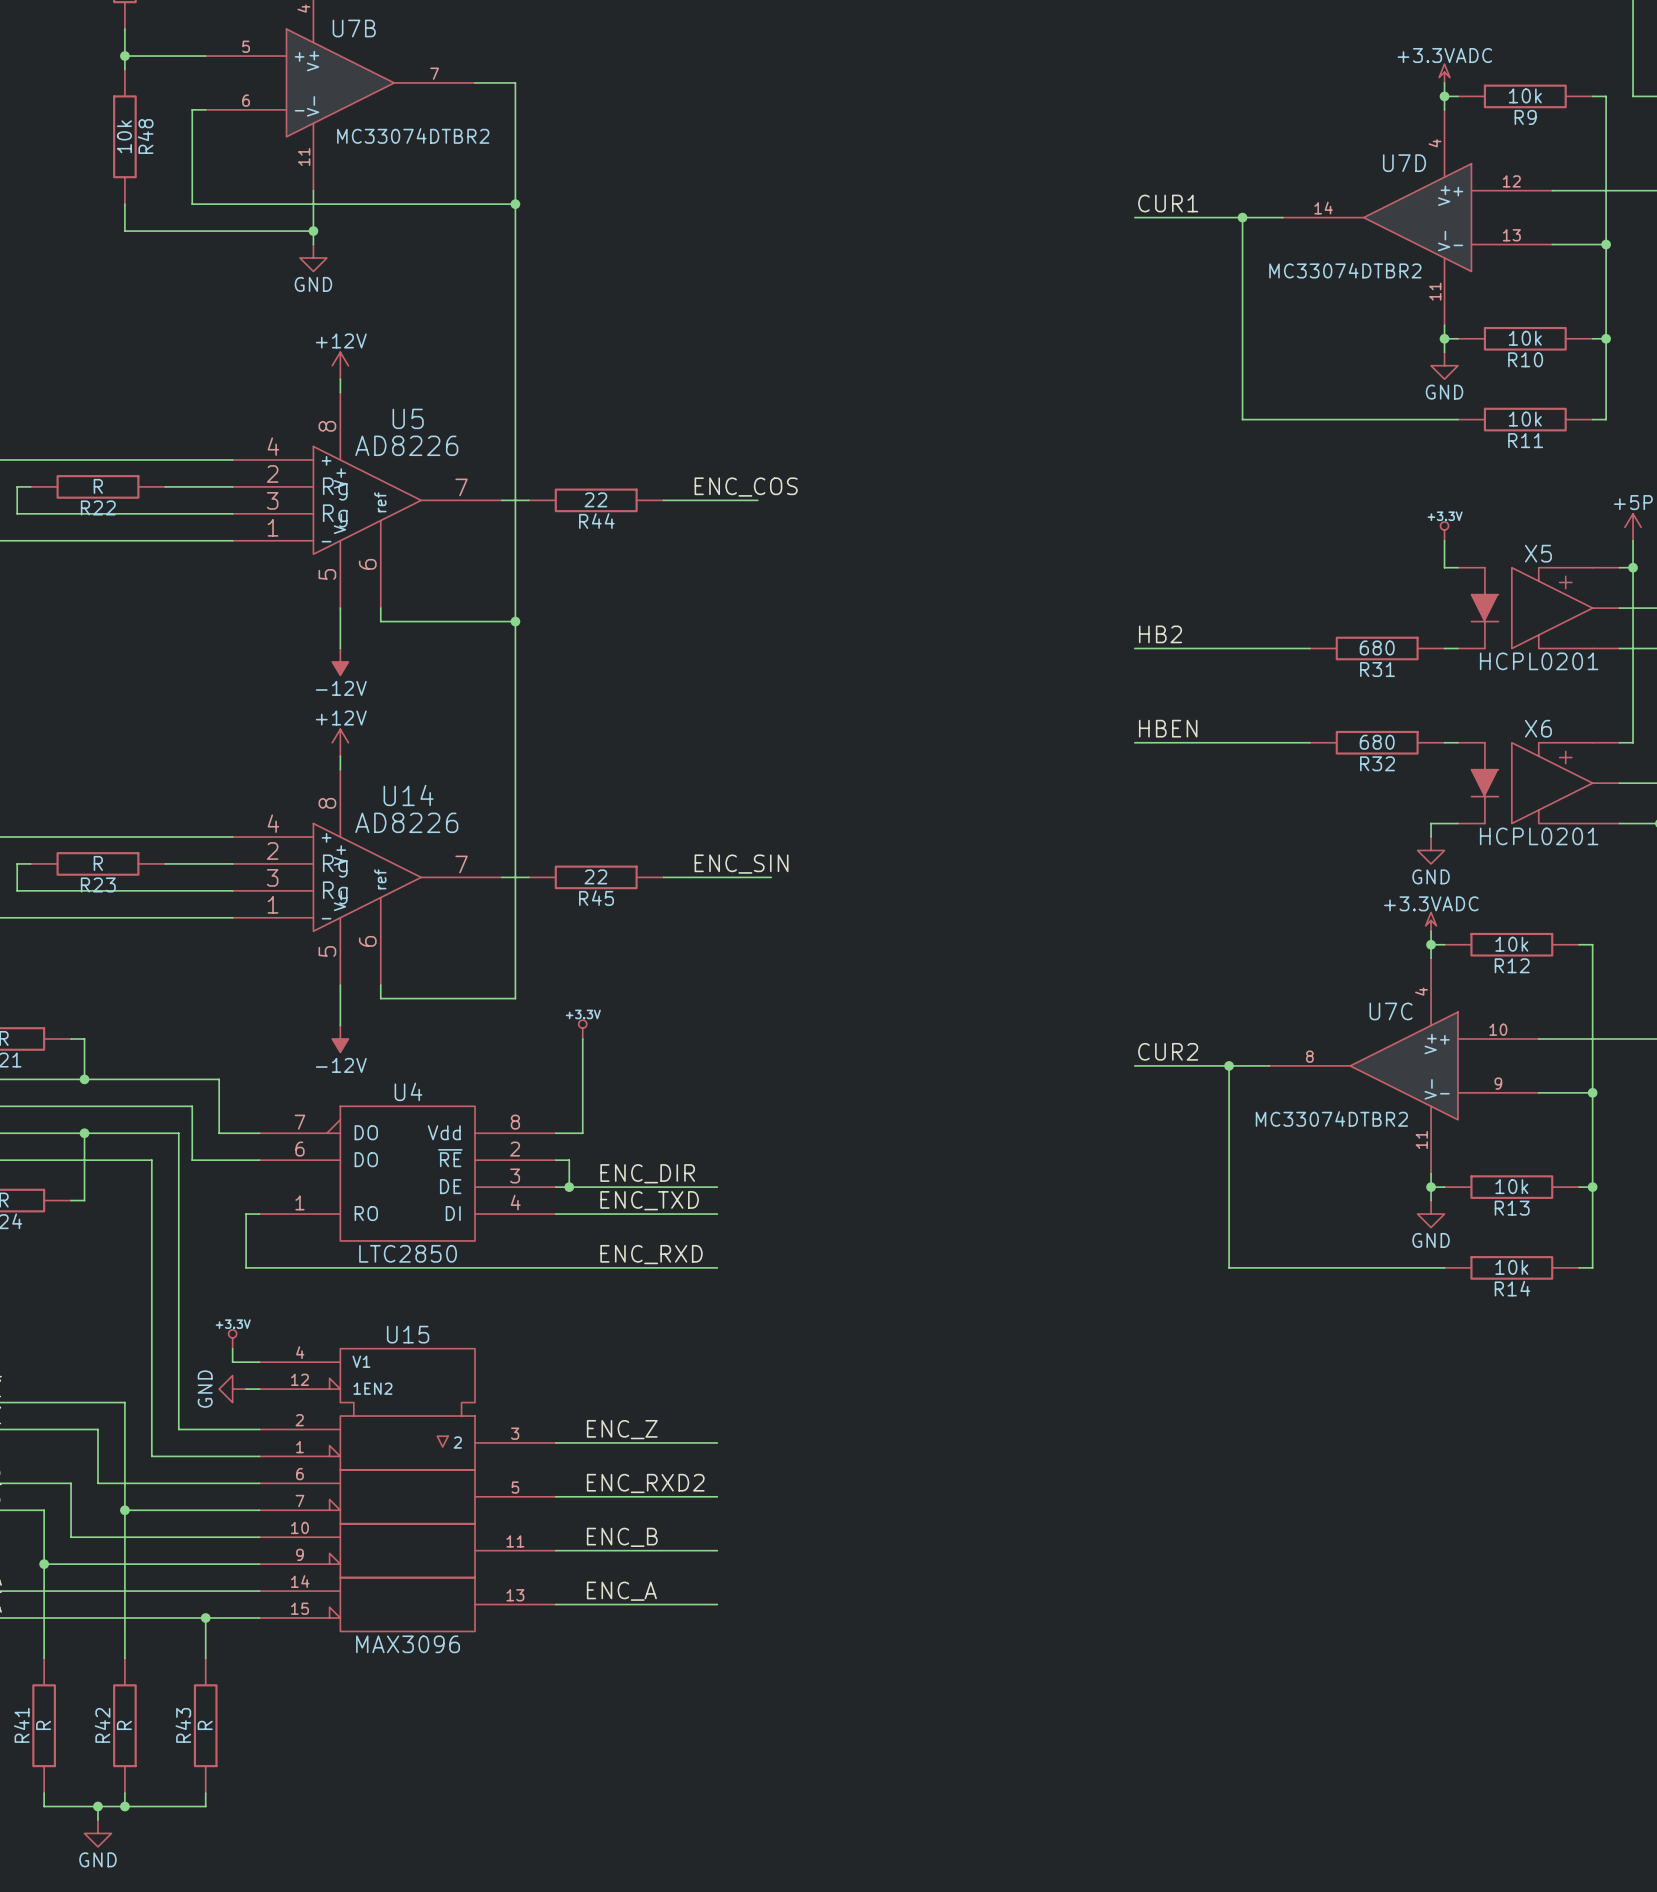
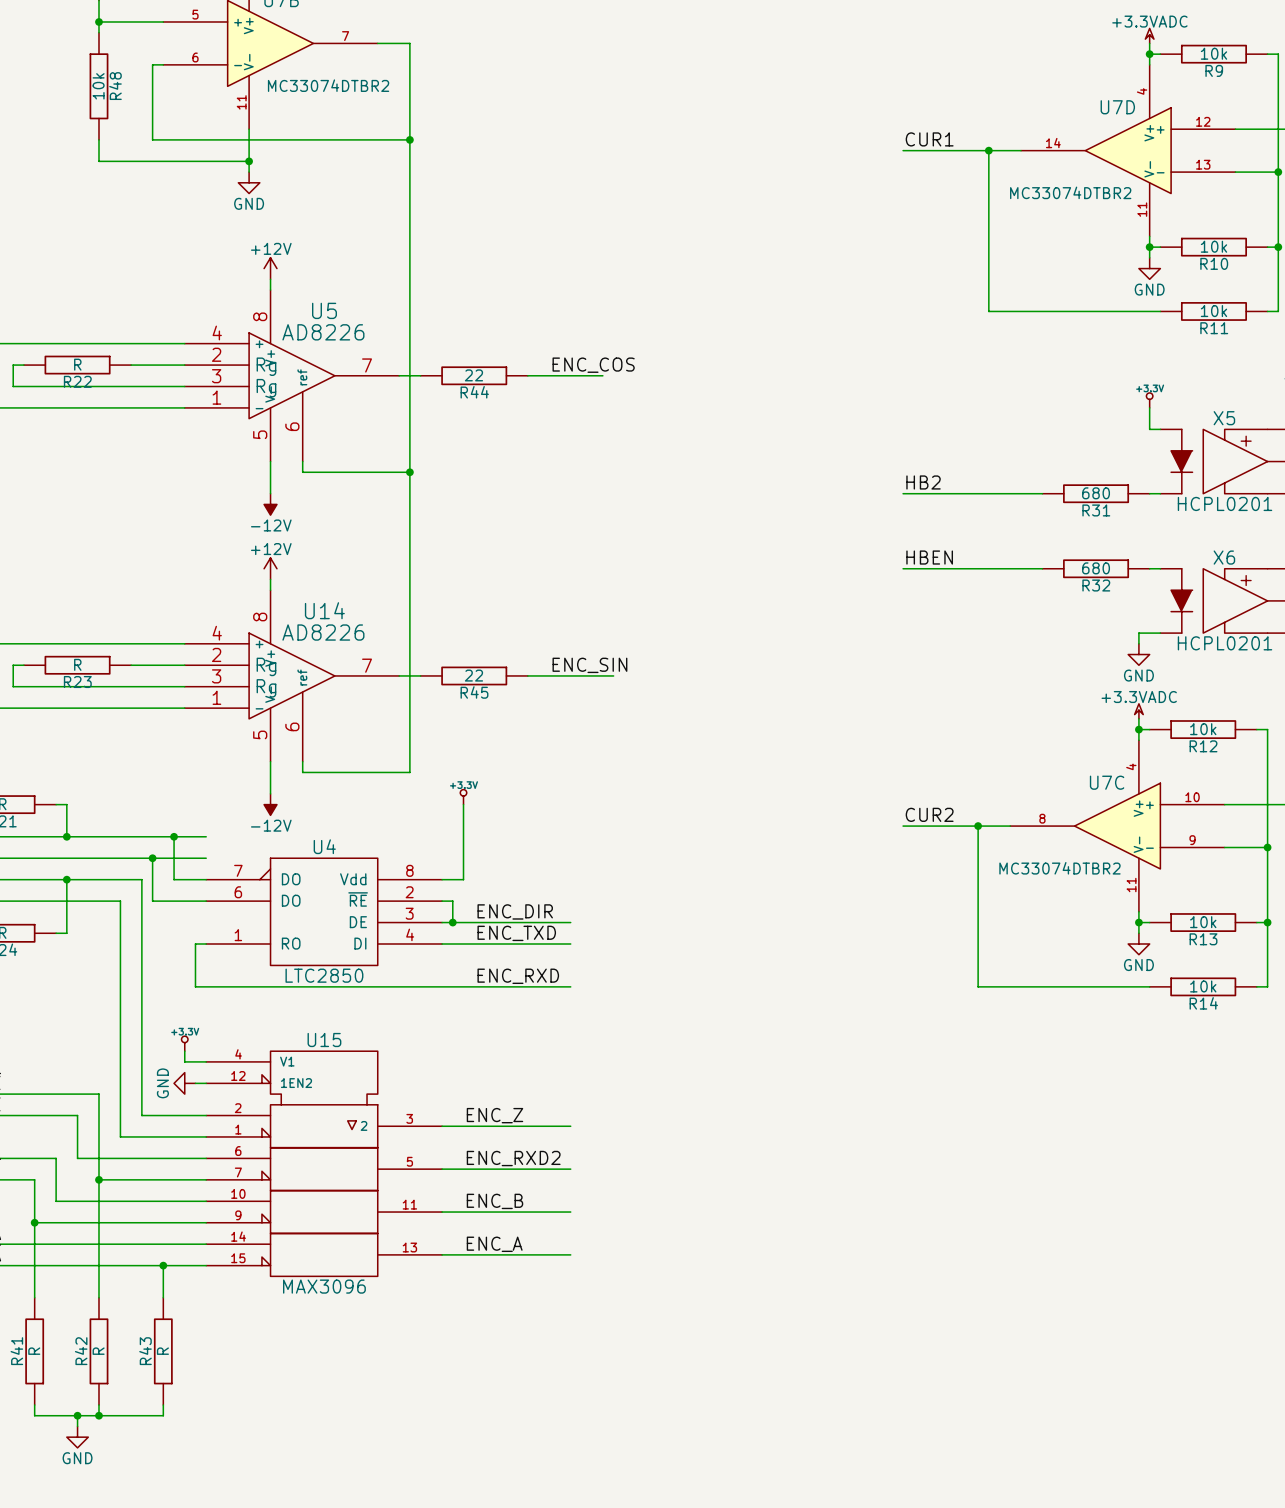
wire: none -> (174, 836) (206, 836)
junction: none -> (174, 836)
wire: none -> (152, 858) (206, 858)
junction: none -> (152, 858)

